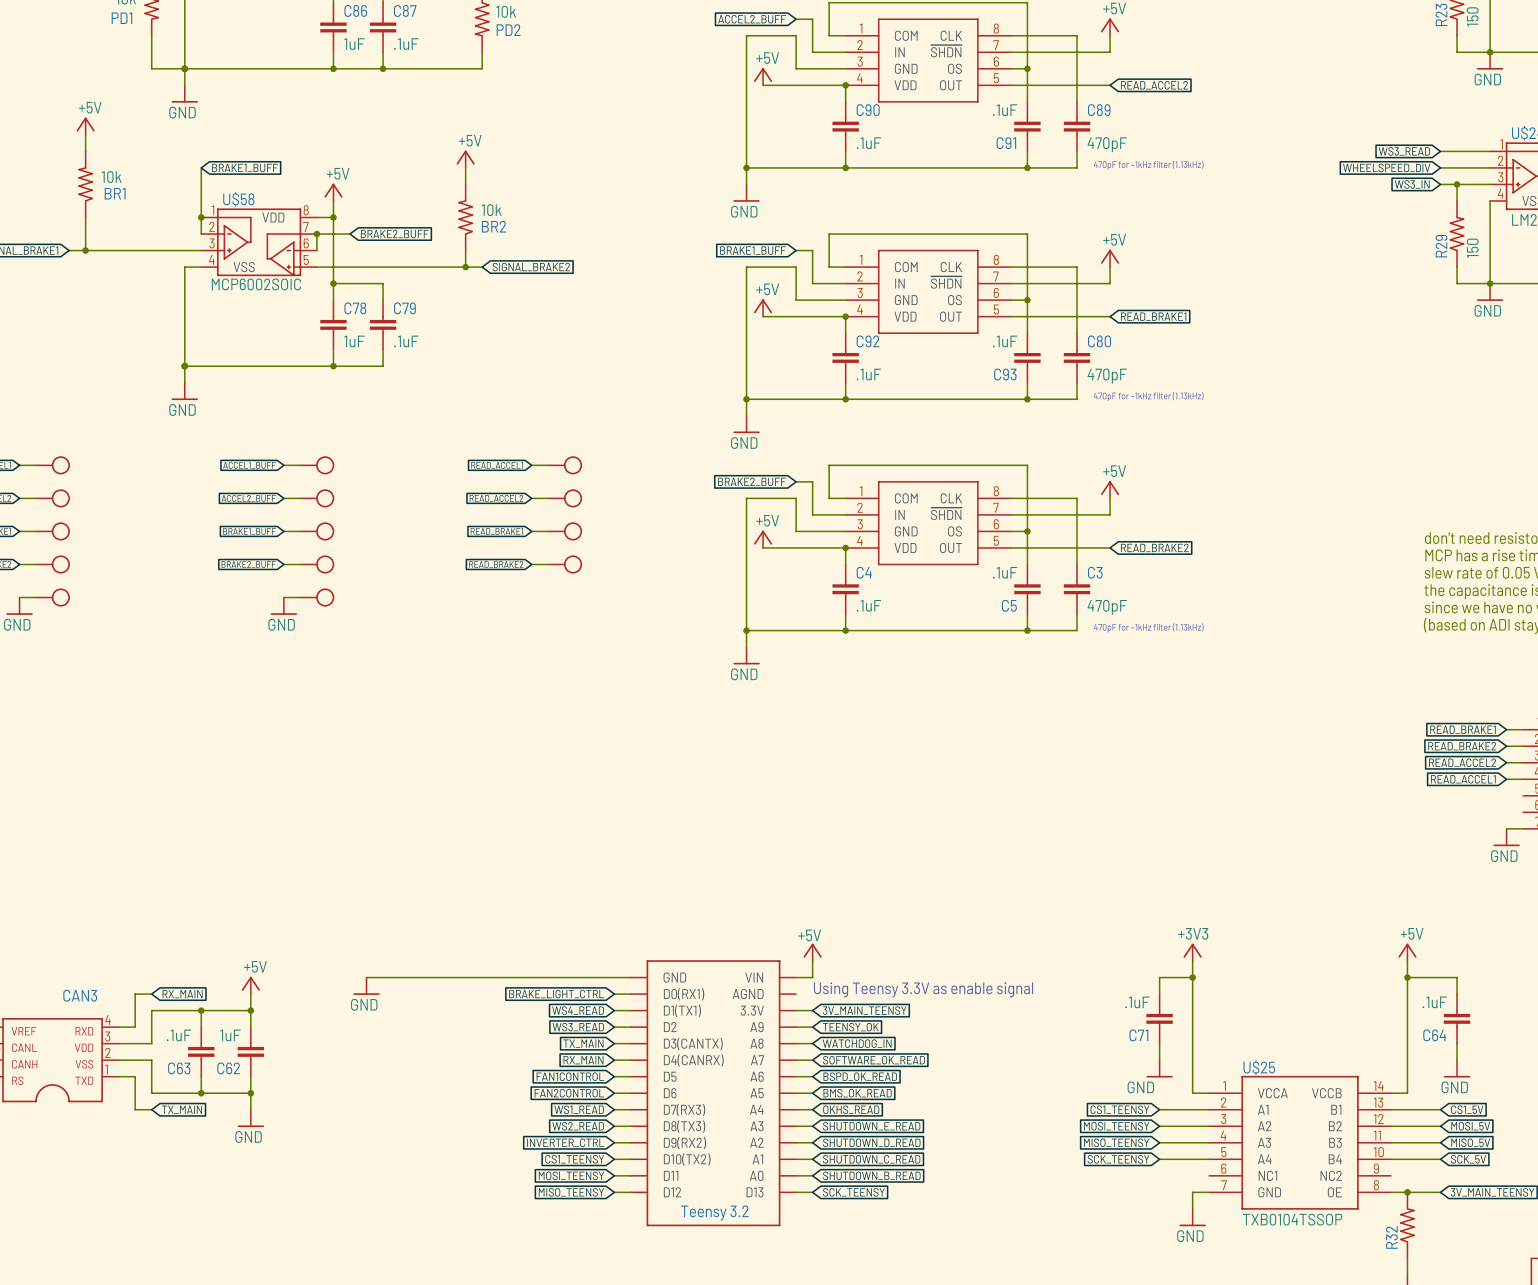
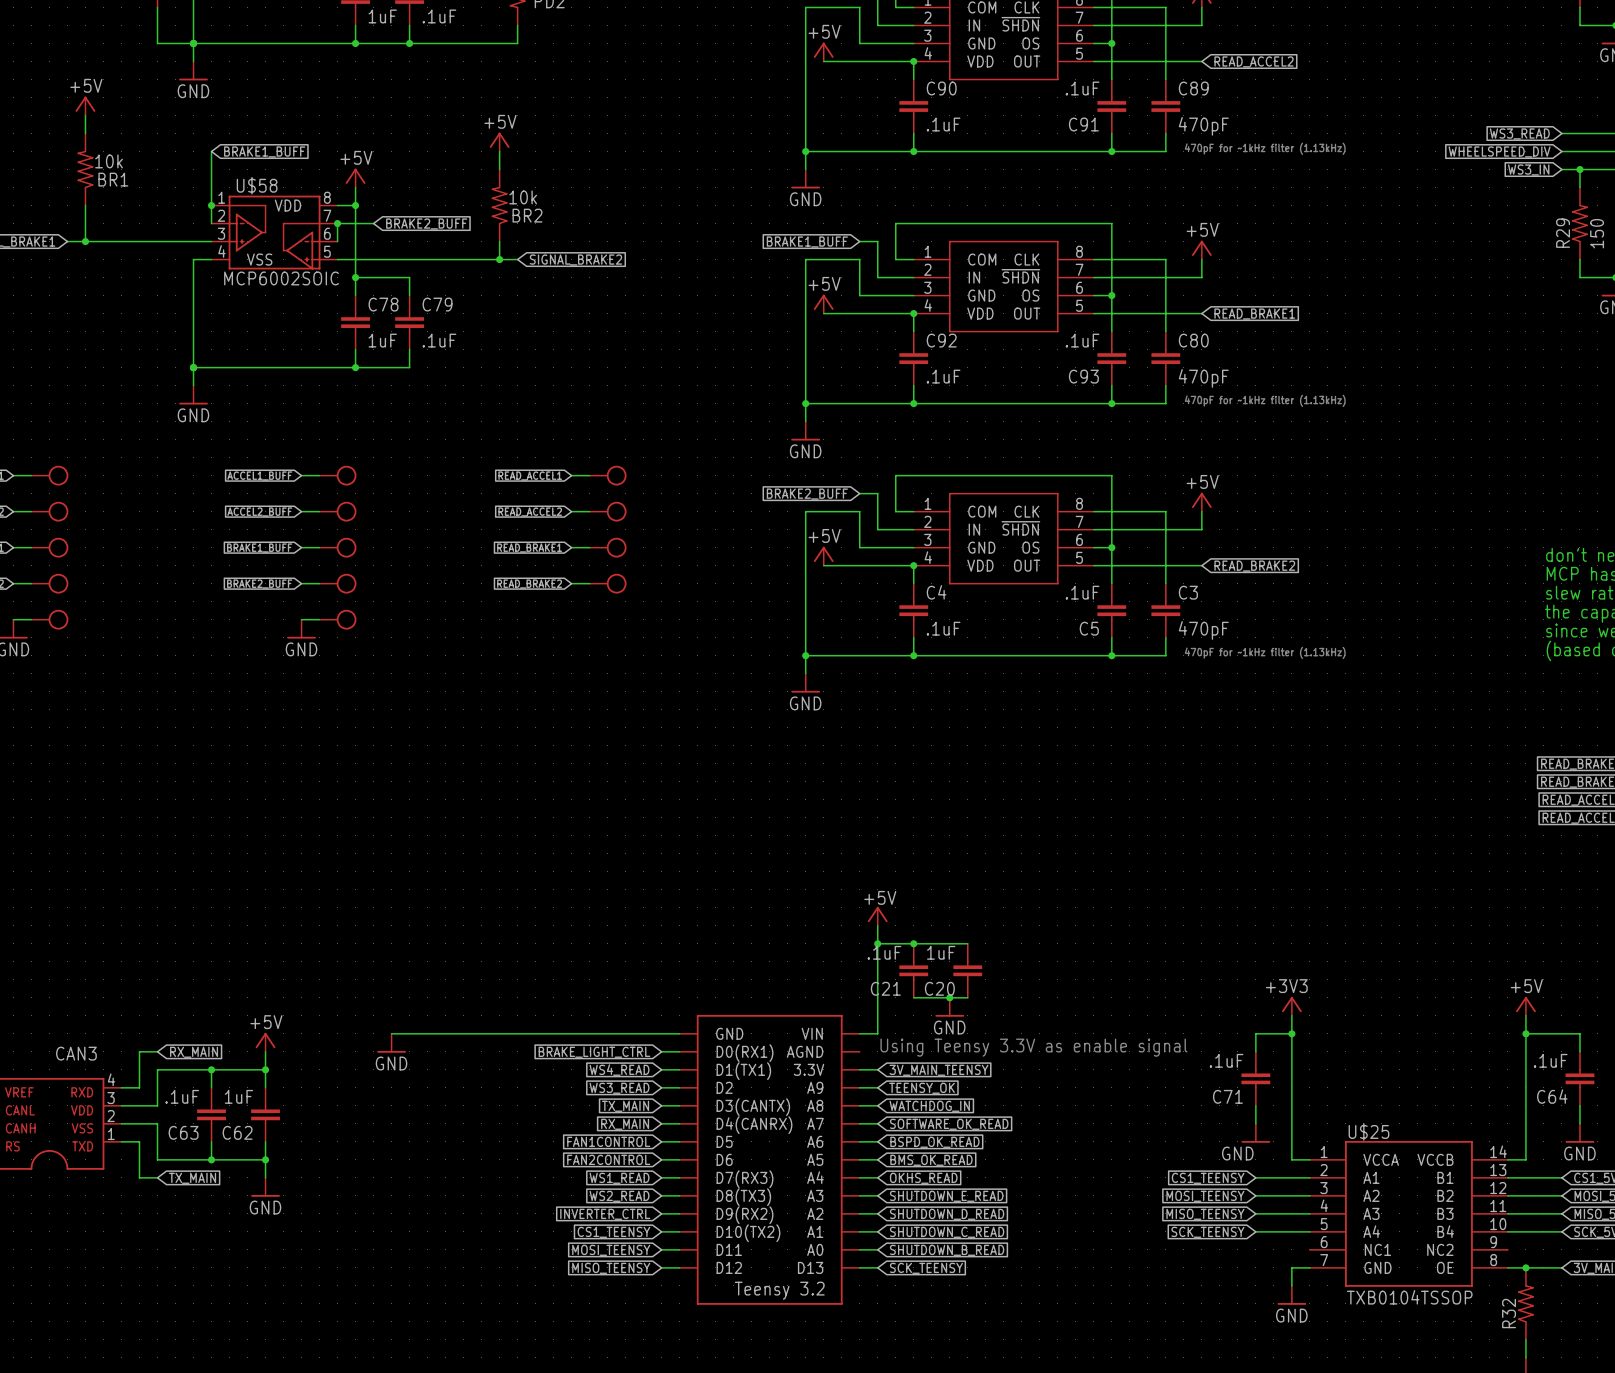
wire: none -> (877, 925) (877, 1015)
wire: none -> (877, 943) (967, 943)
junction: none -> (877, 943)
junction: none -> (913, 943)
C21: none -> .1uF (913, 970)
C20: none -> 1uF (967, 970)
wire: none -> (913, 997) (967, 997)
junction: none -> (949, 997)
power symbol position: +5V (812, 952) -> +5V (877, 916)
power symbol: none -> GND (949, 1007)

